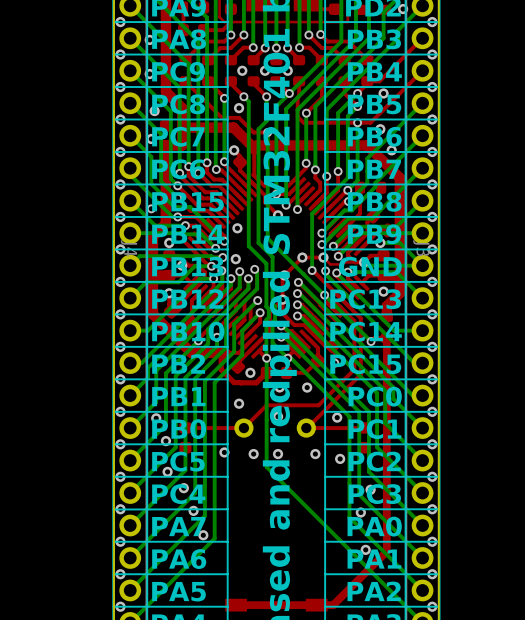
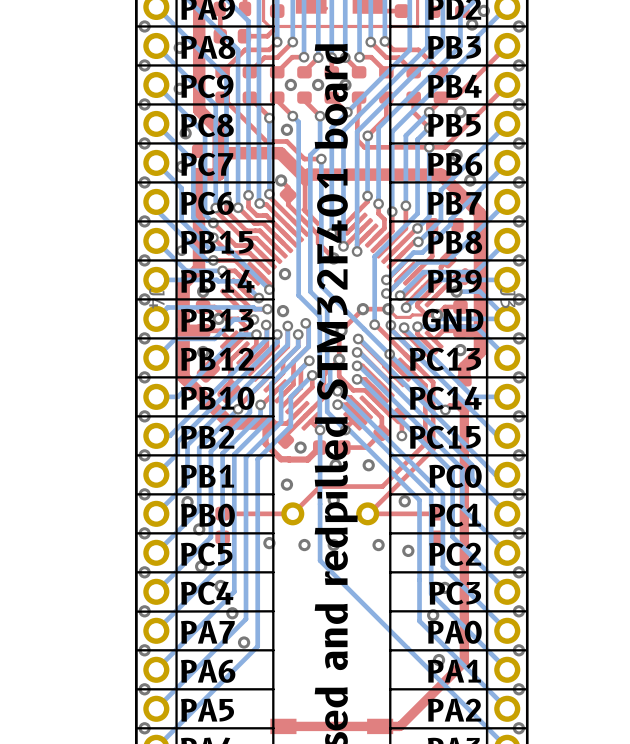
via: none -> (472, 24)

